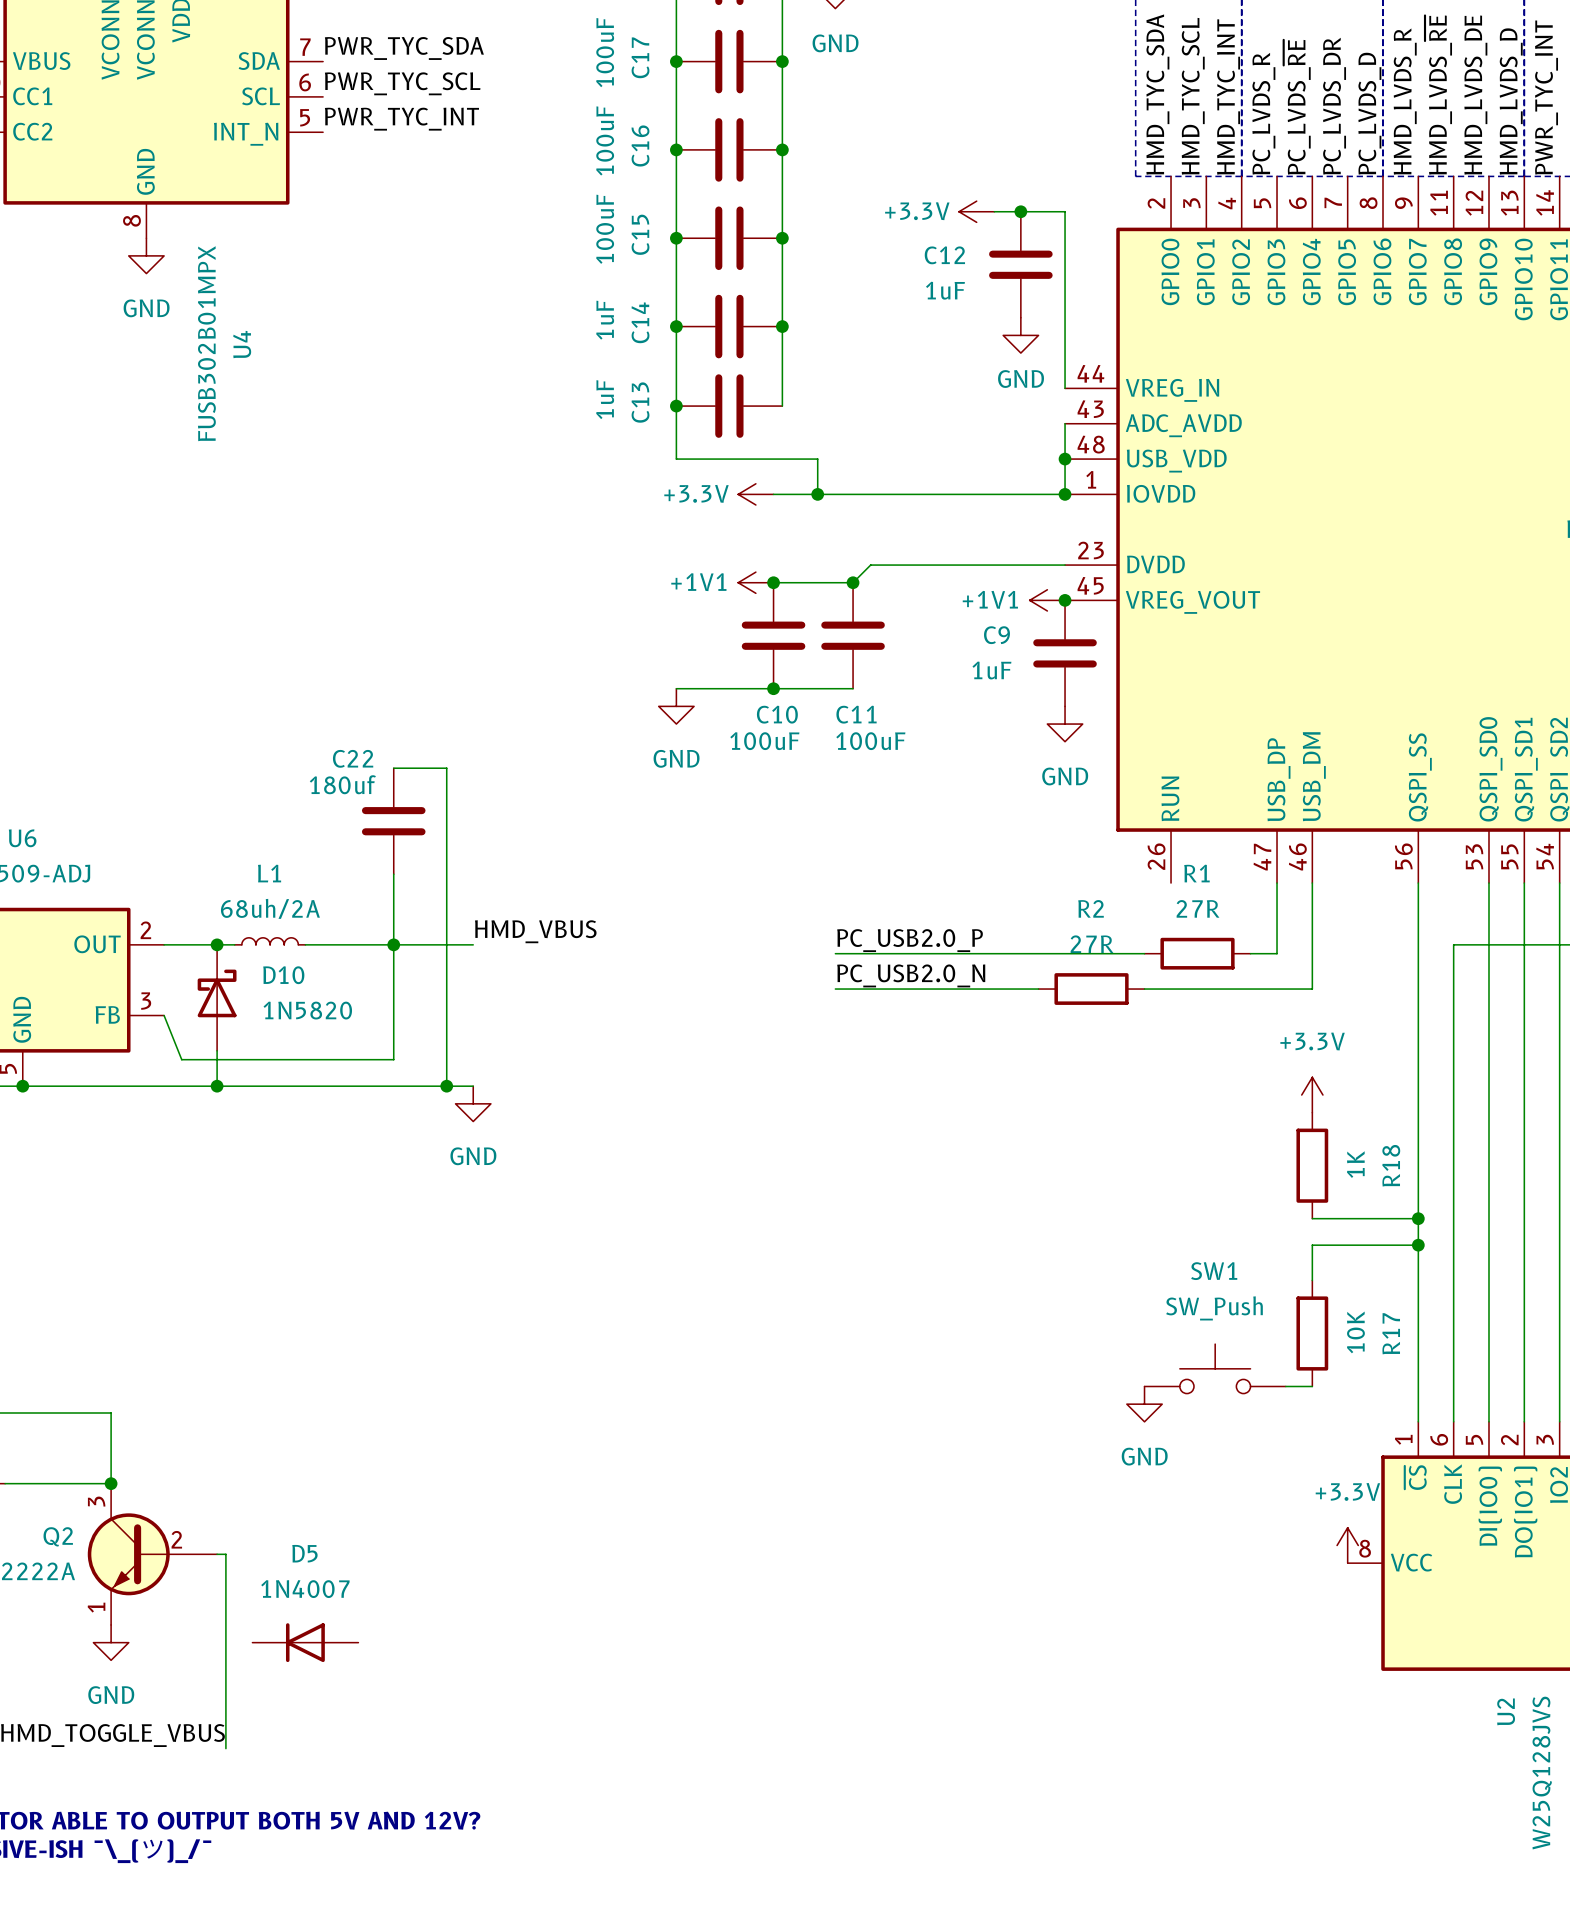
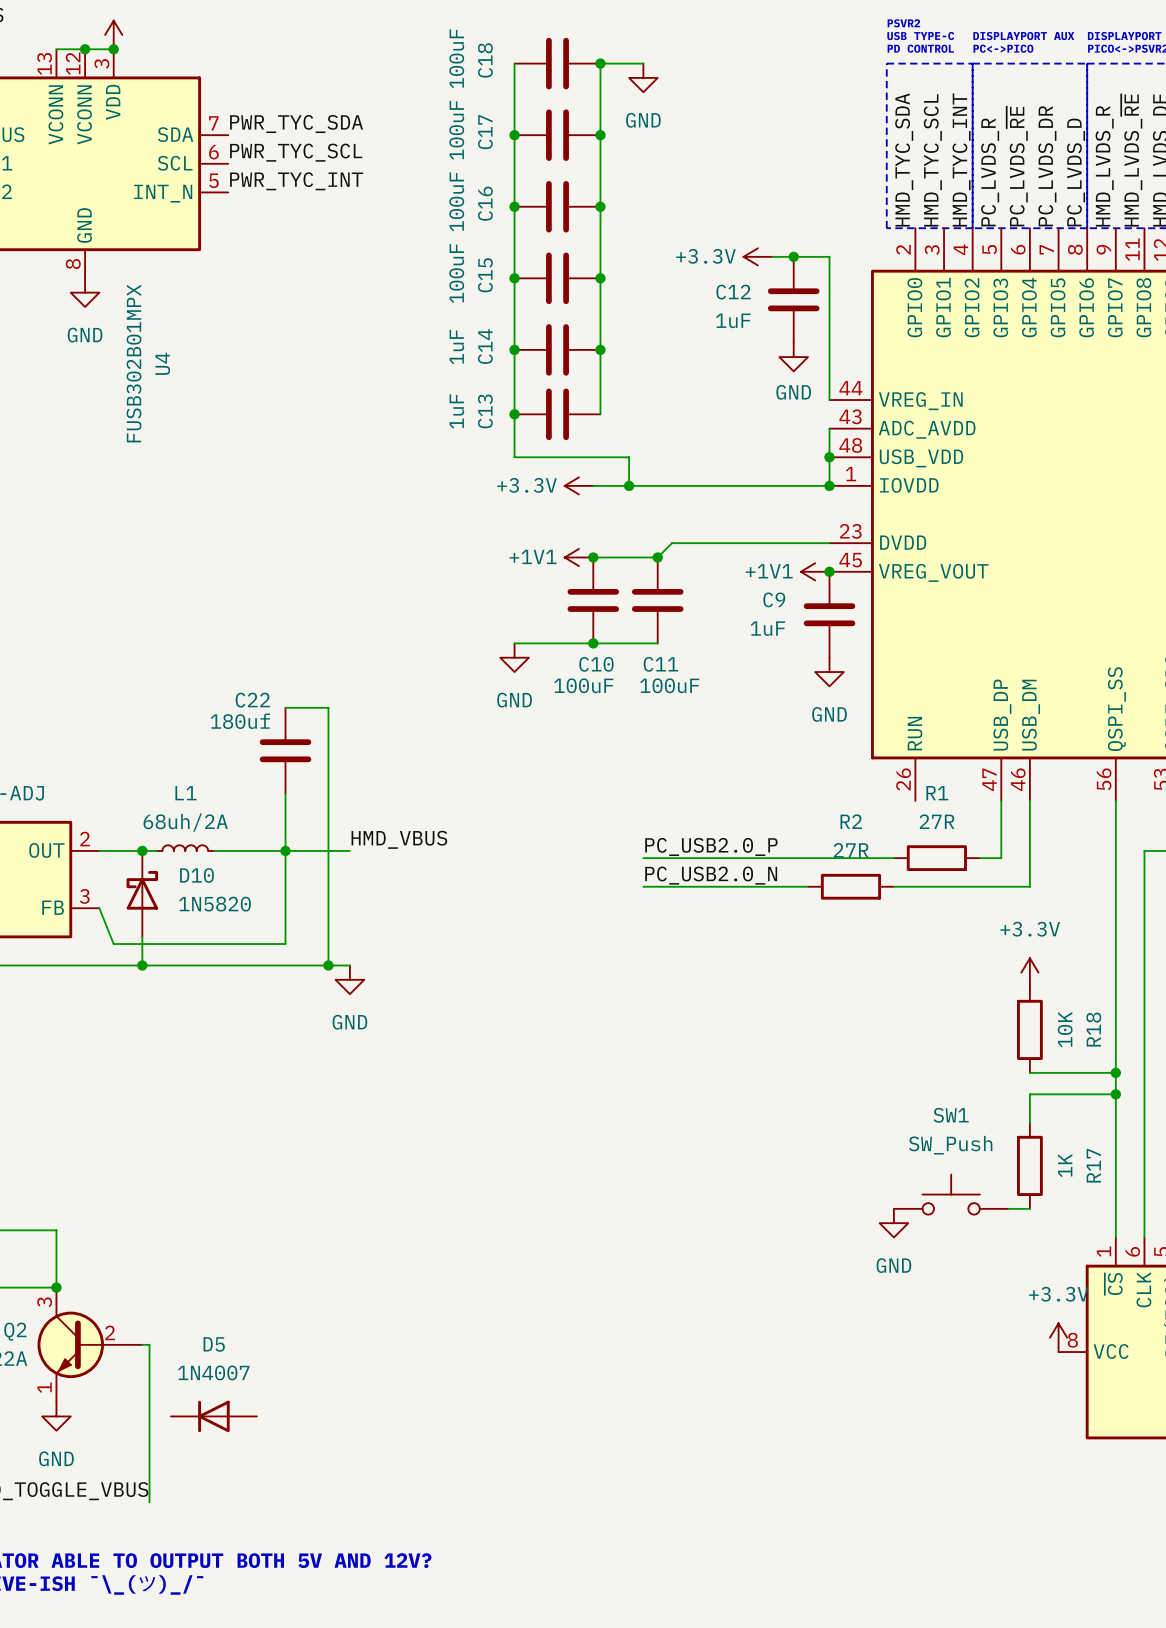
R18 value: 1K (1355, 1164) -> 10K (1065, 1029)
R17 value: 10K (1355, 1332) -> 1K (1065, 1165)

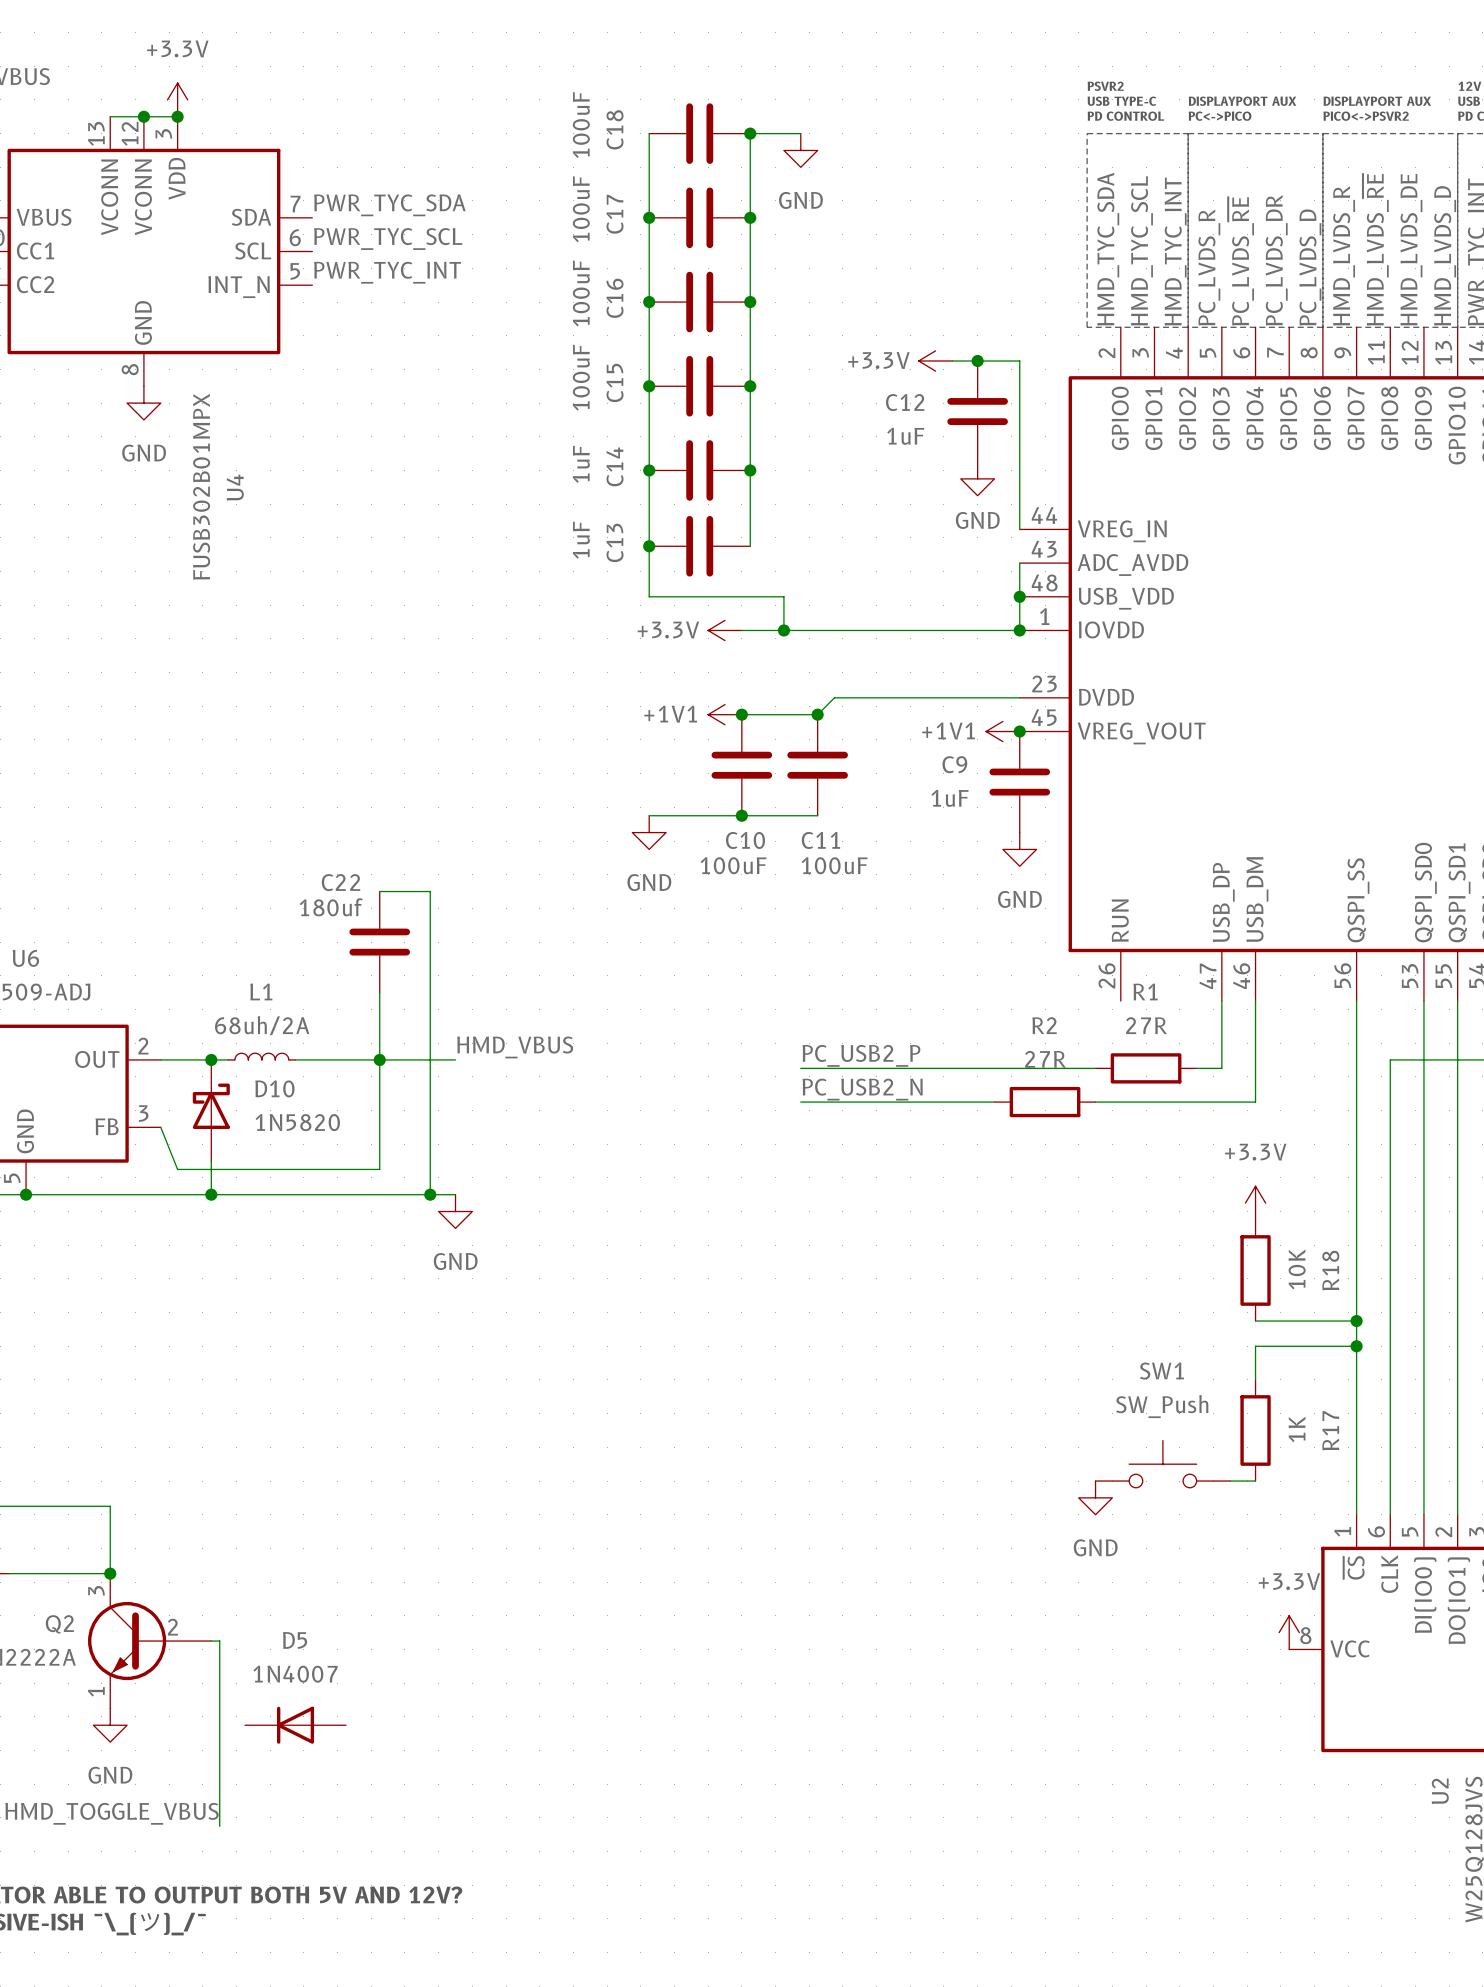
label: PC_USB2.0_P (711, 846) -> PC_USB2_P (861, 1055)
label: PC_USB2.0_N (711, 875) -> PC_USB2_N (862, 1089)

